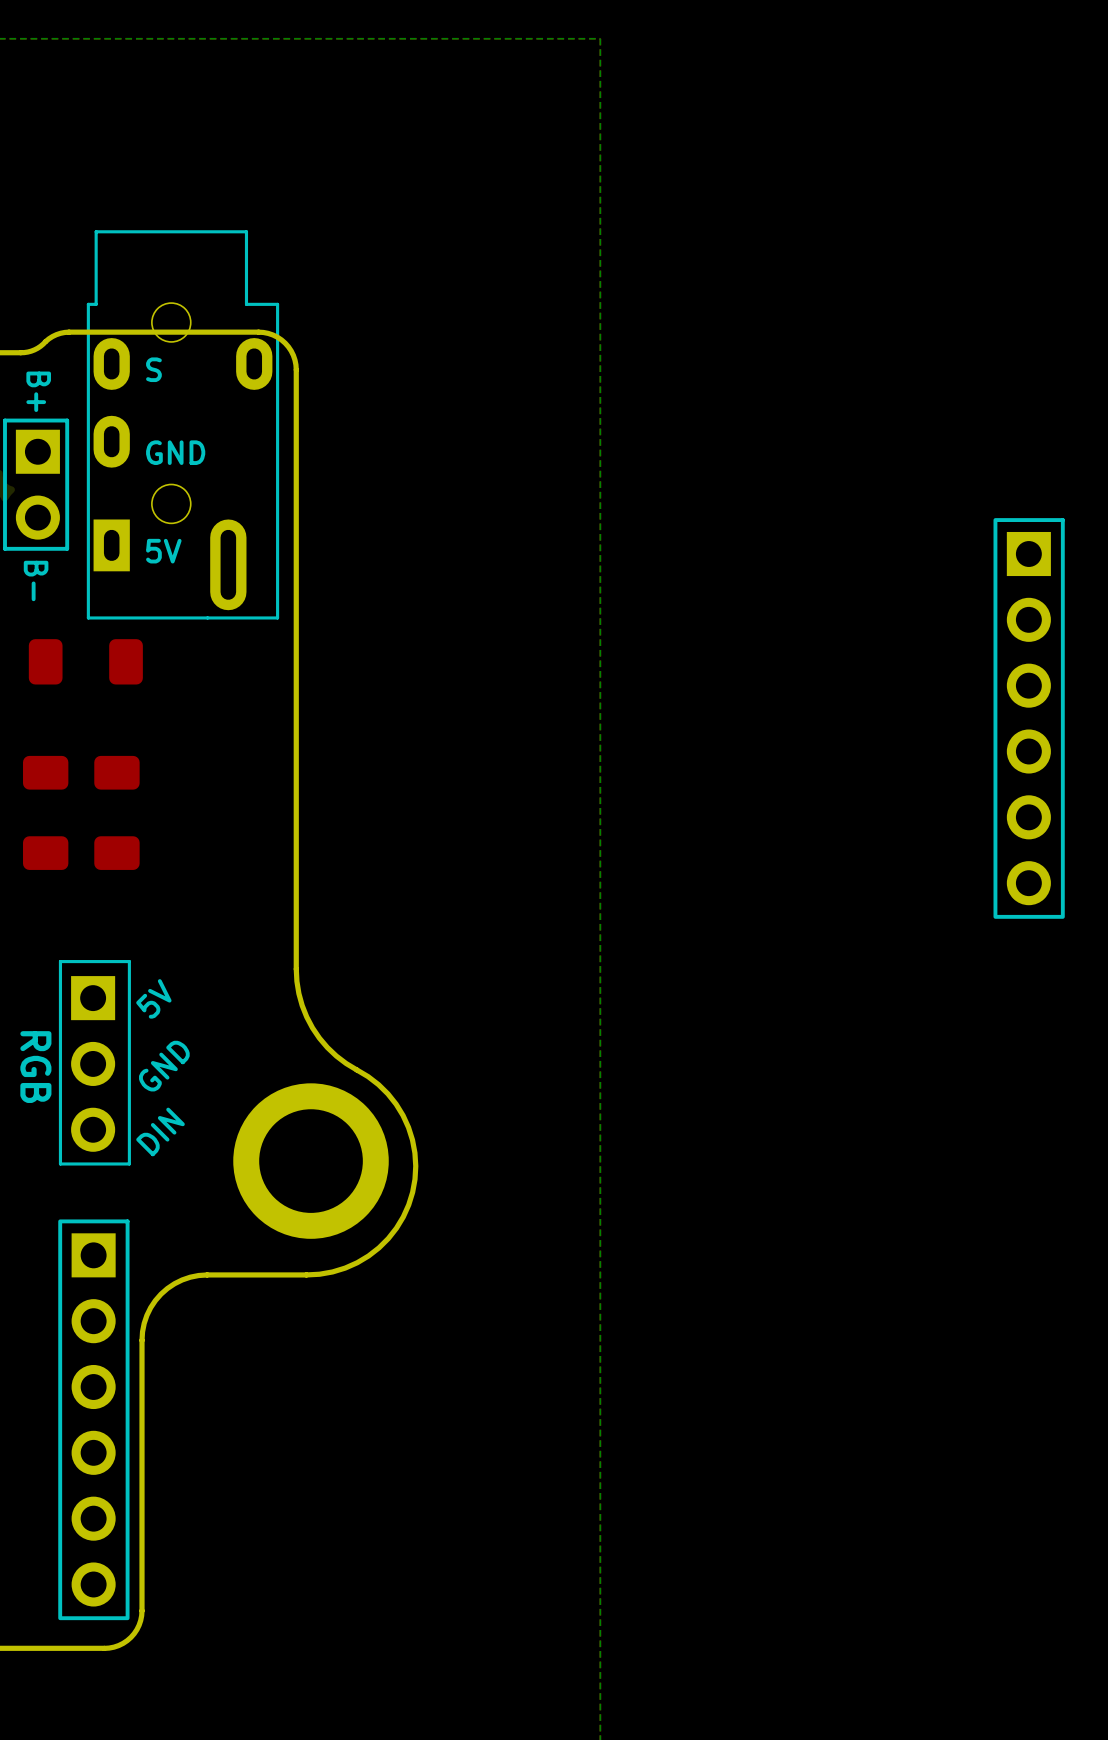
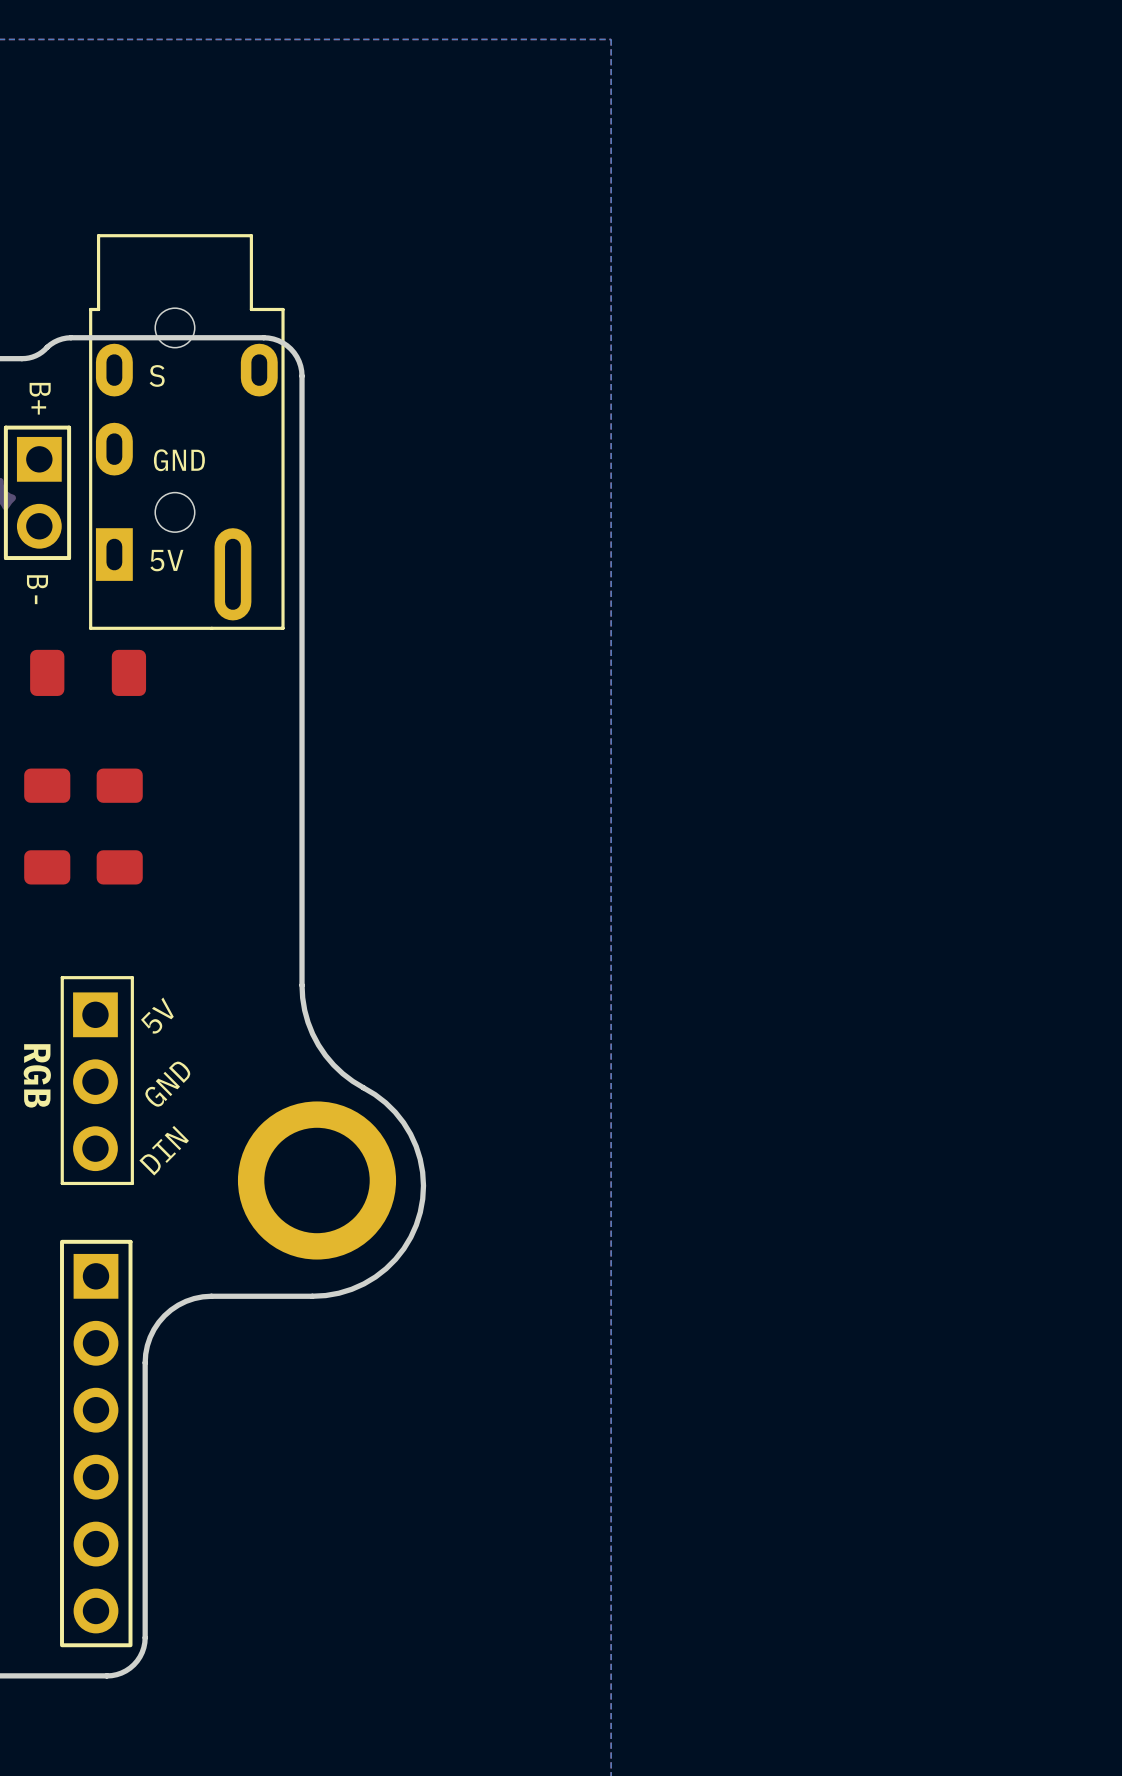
part: (1029, 718) -> none

